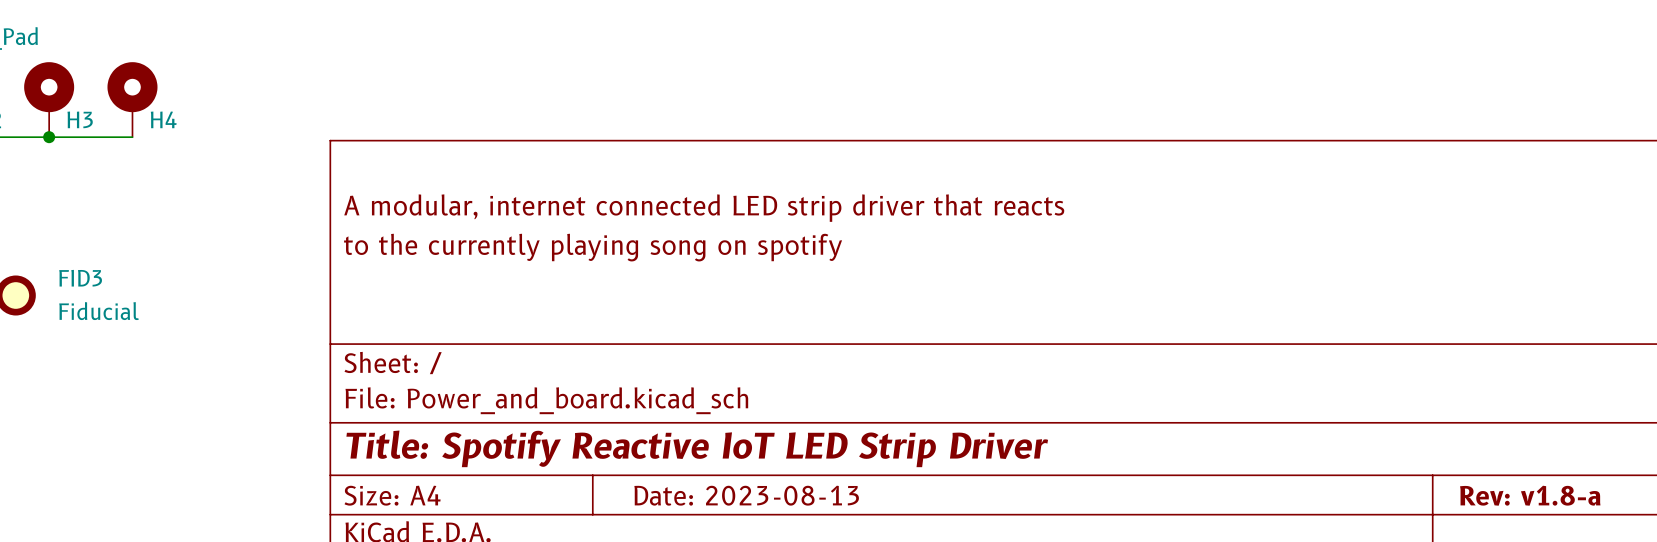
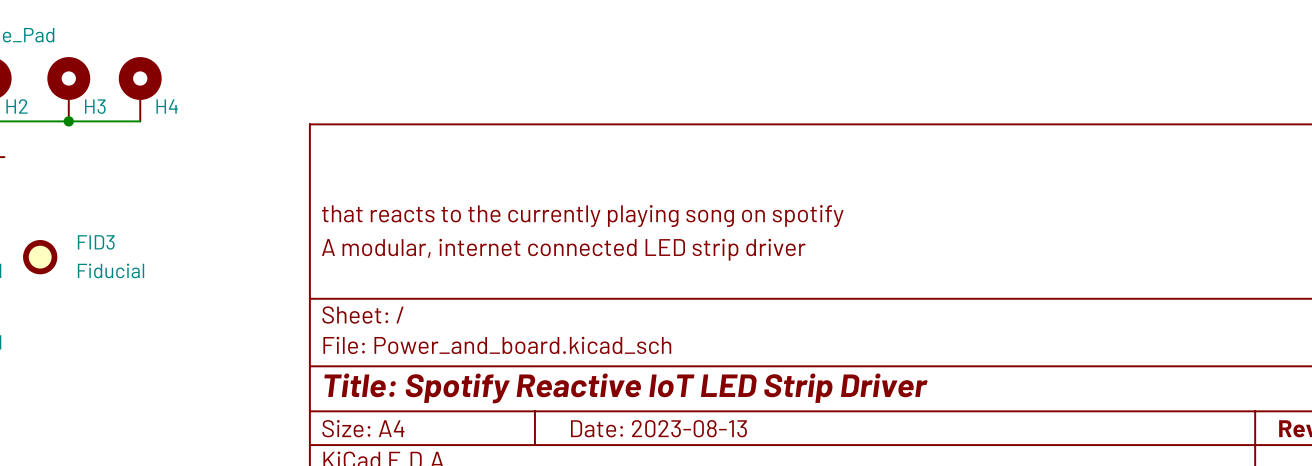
title block: A modular, internet connected LED strip driver that reacts (704, 208) -> none
title block: to the currently playing song on spotify (593, 247) -> that reacts to the currently playing song on spotify (582, 216)
title block: none -> A modular, internet connected LED strip driver (563, 249)

